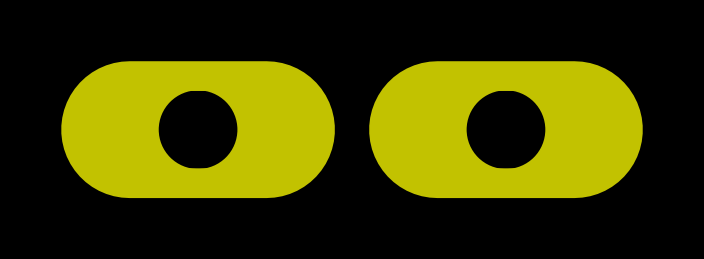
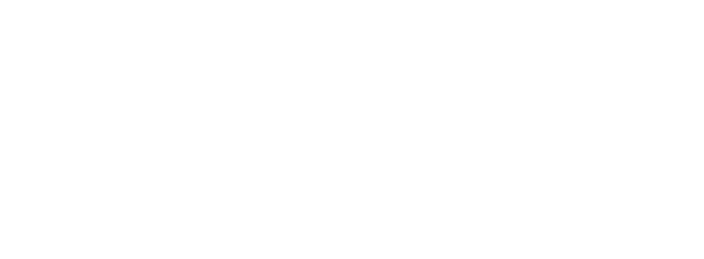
part: (198, 129) -> none
part: (505, 129) -> none

